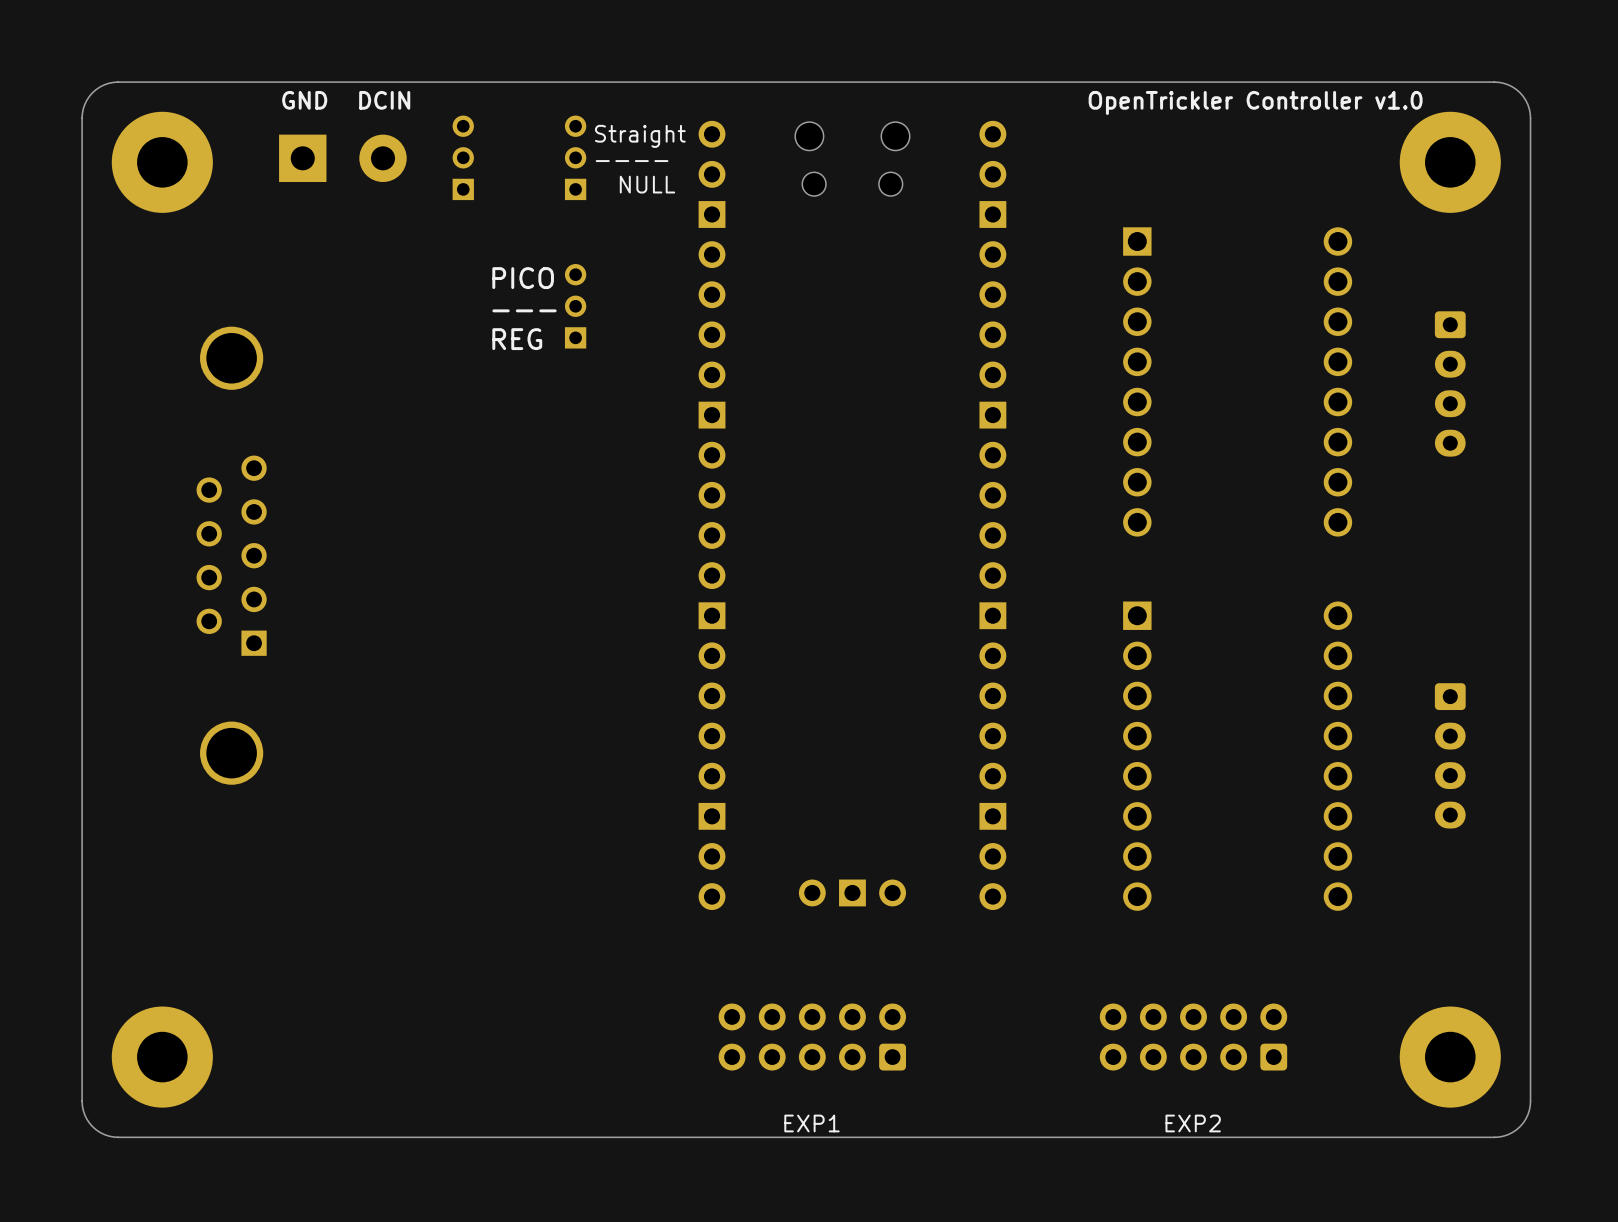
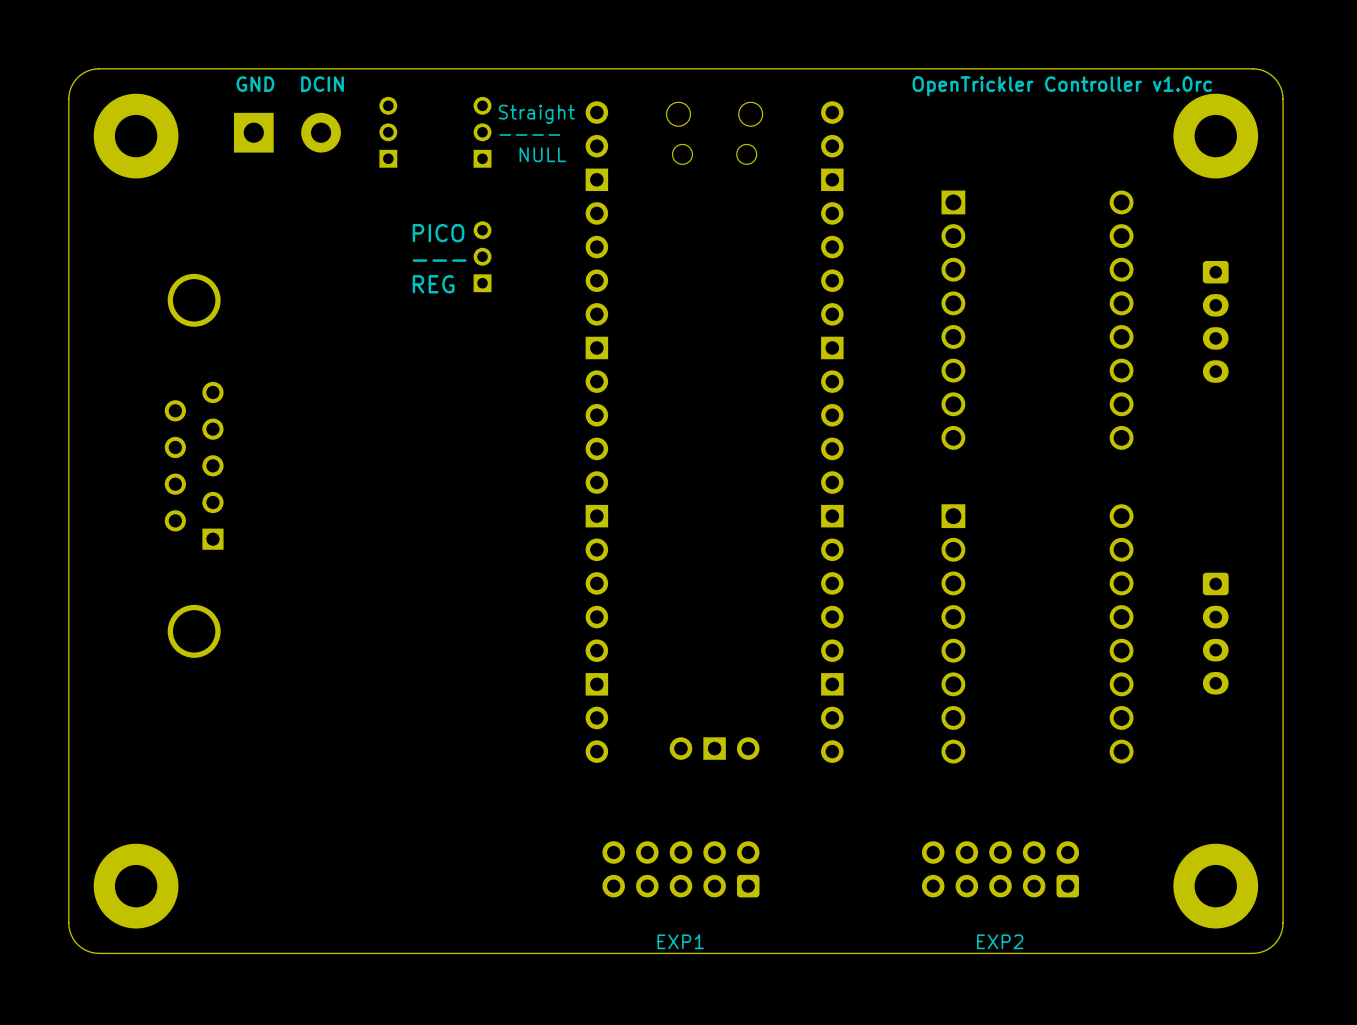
text: OpenTrickler Controller v1.0 (1255, 102) -> OpenTrickler Controller v1.0rc (1062, 86)

